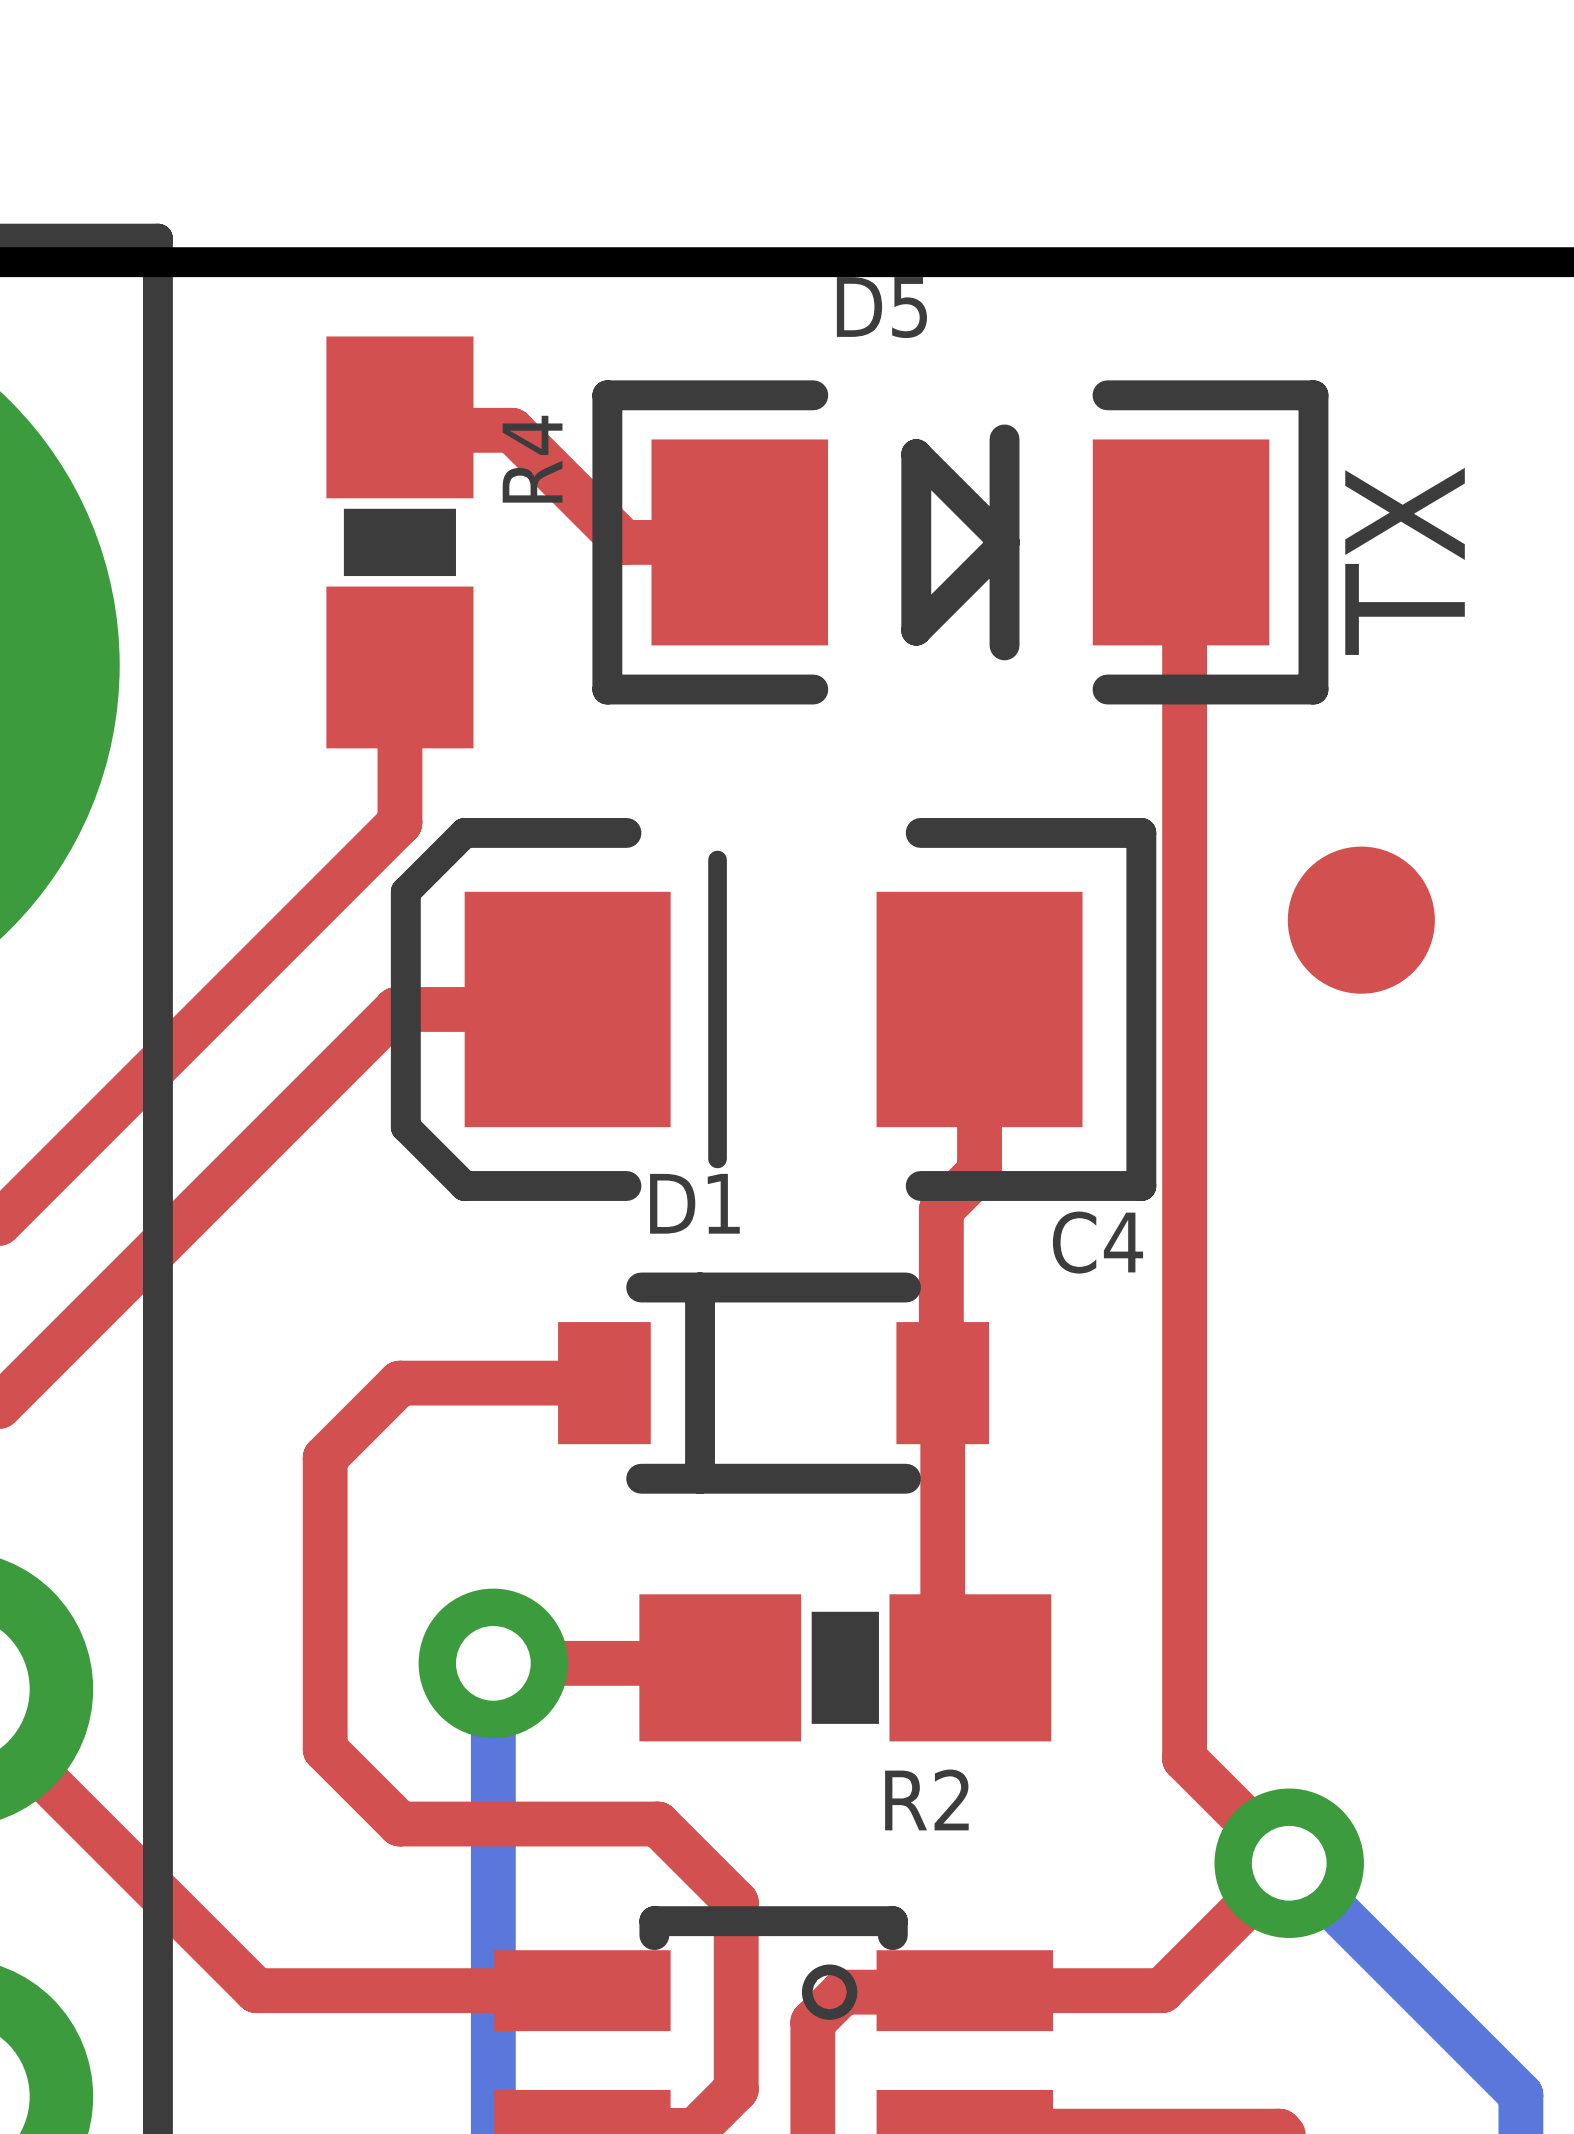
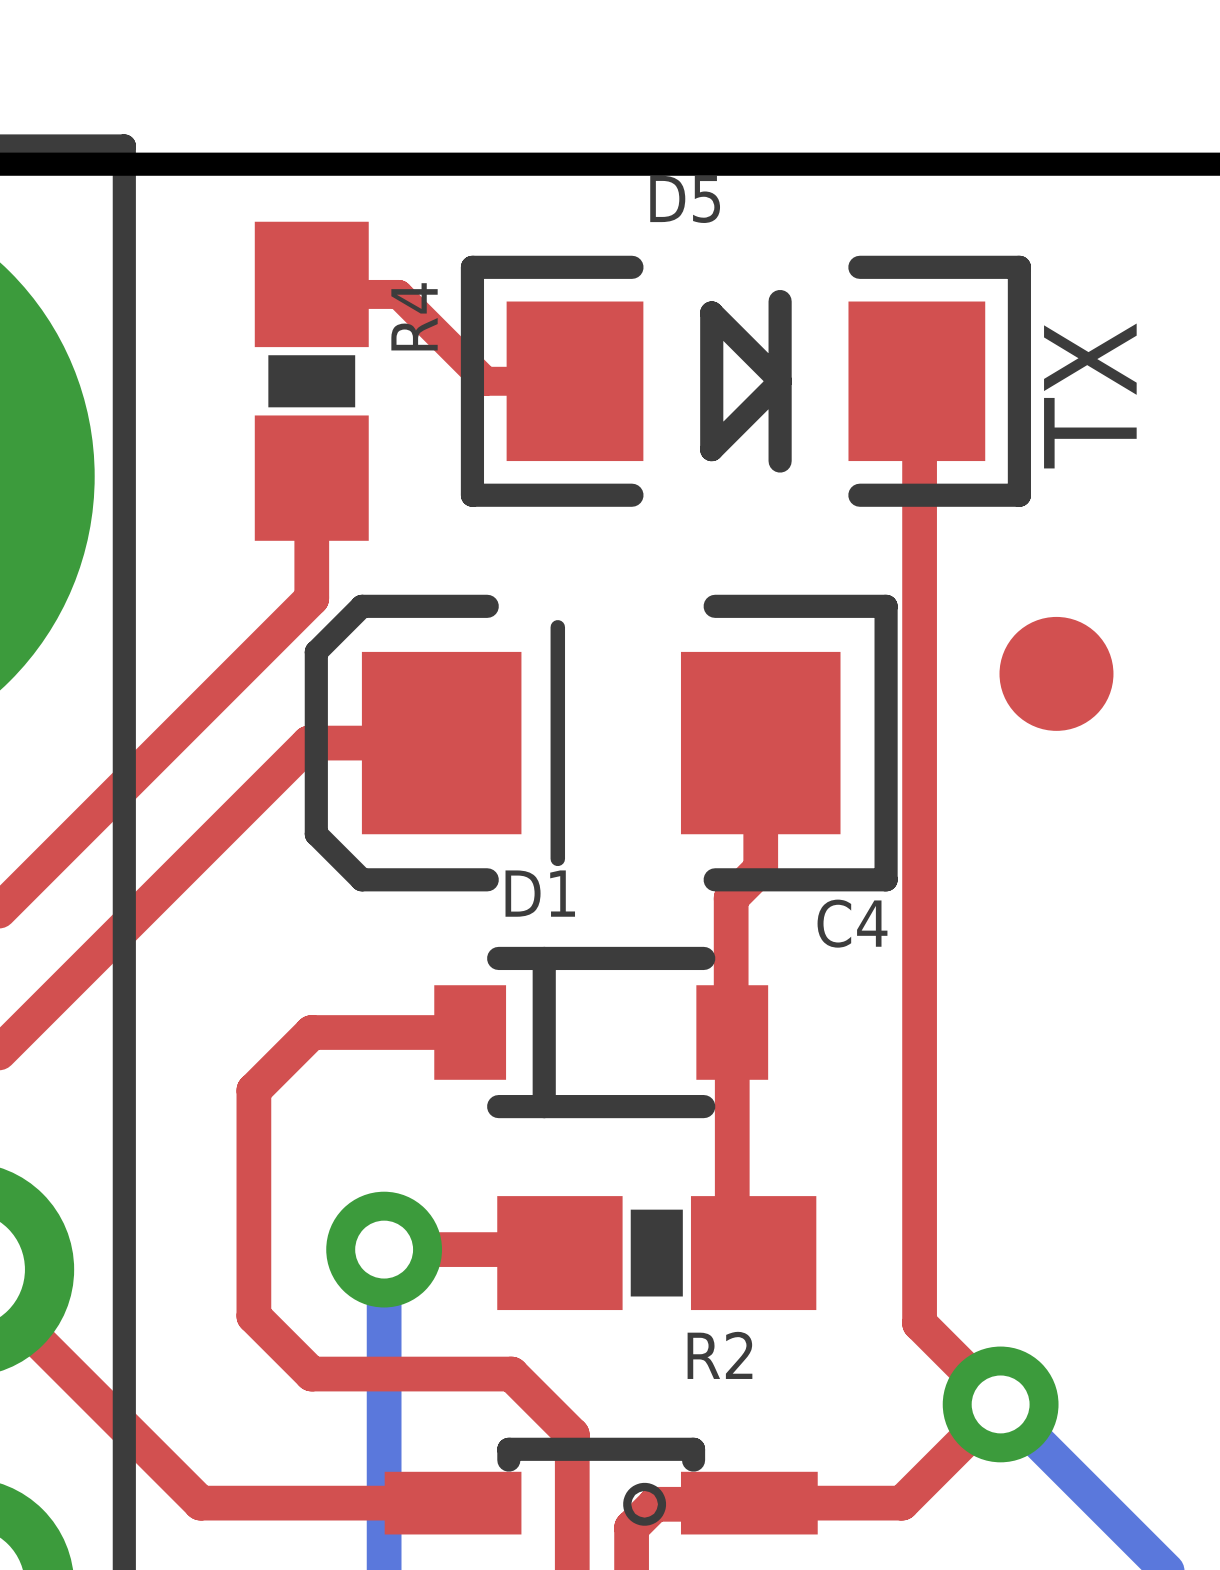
top track width: thick (412, 430) (512, 430) (624, 542) (736, 542) -> thin (321, 294) (398, 294) (485, 381) (572, 381)

